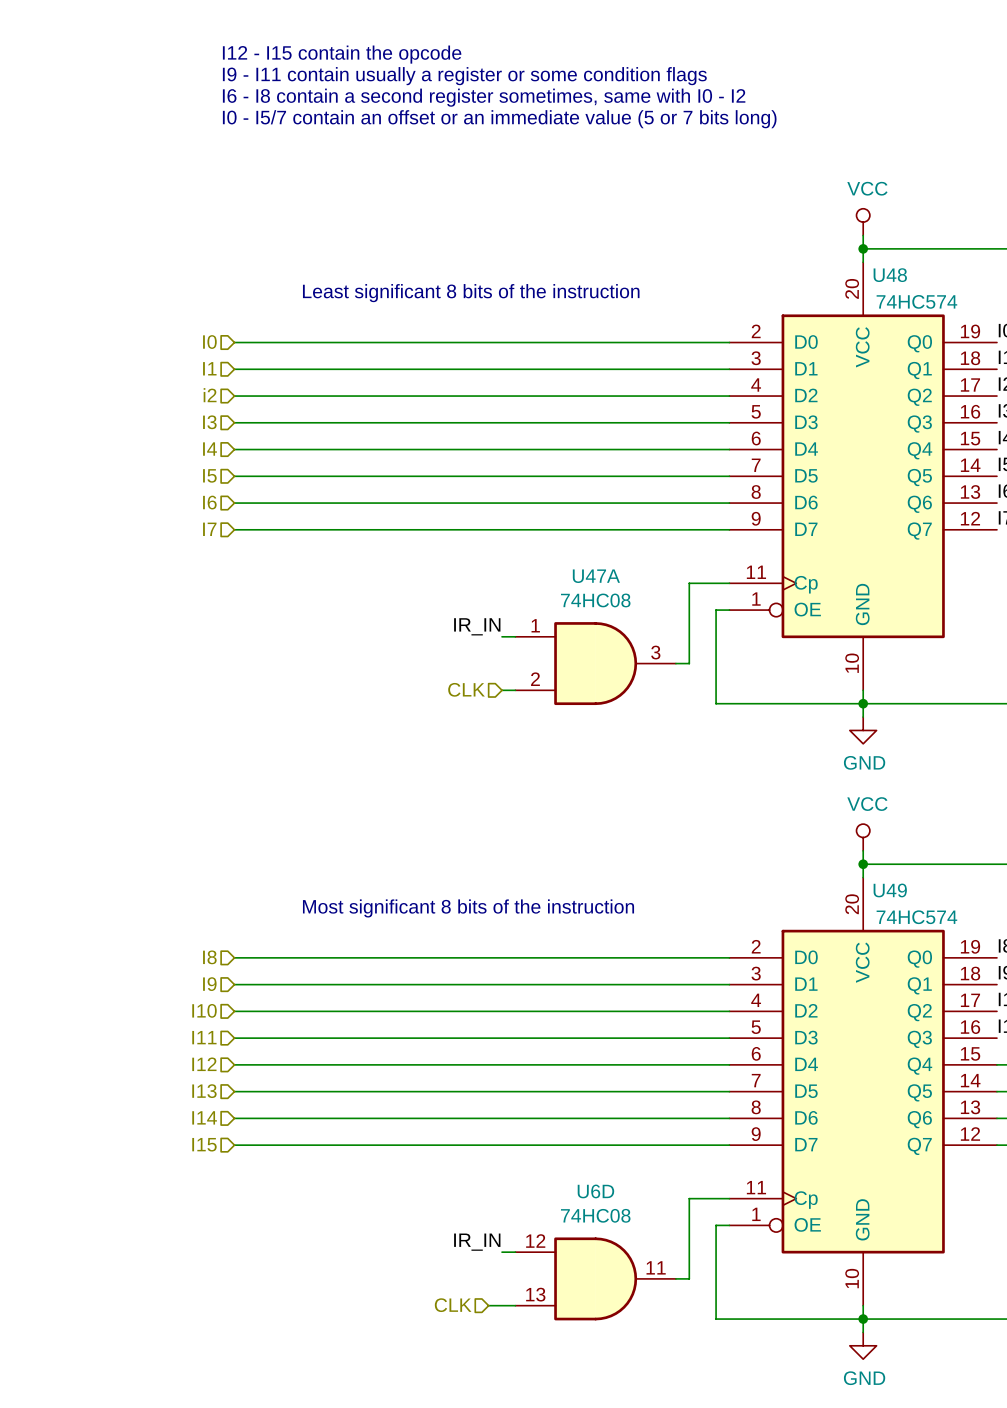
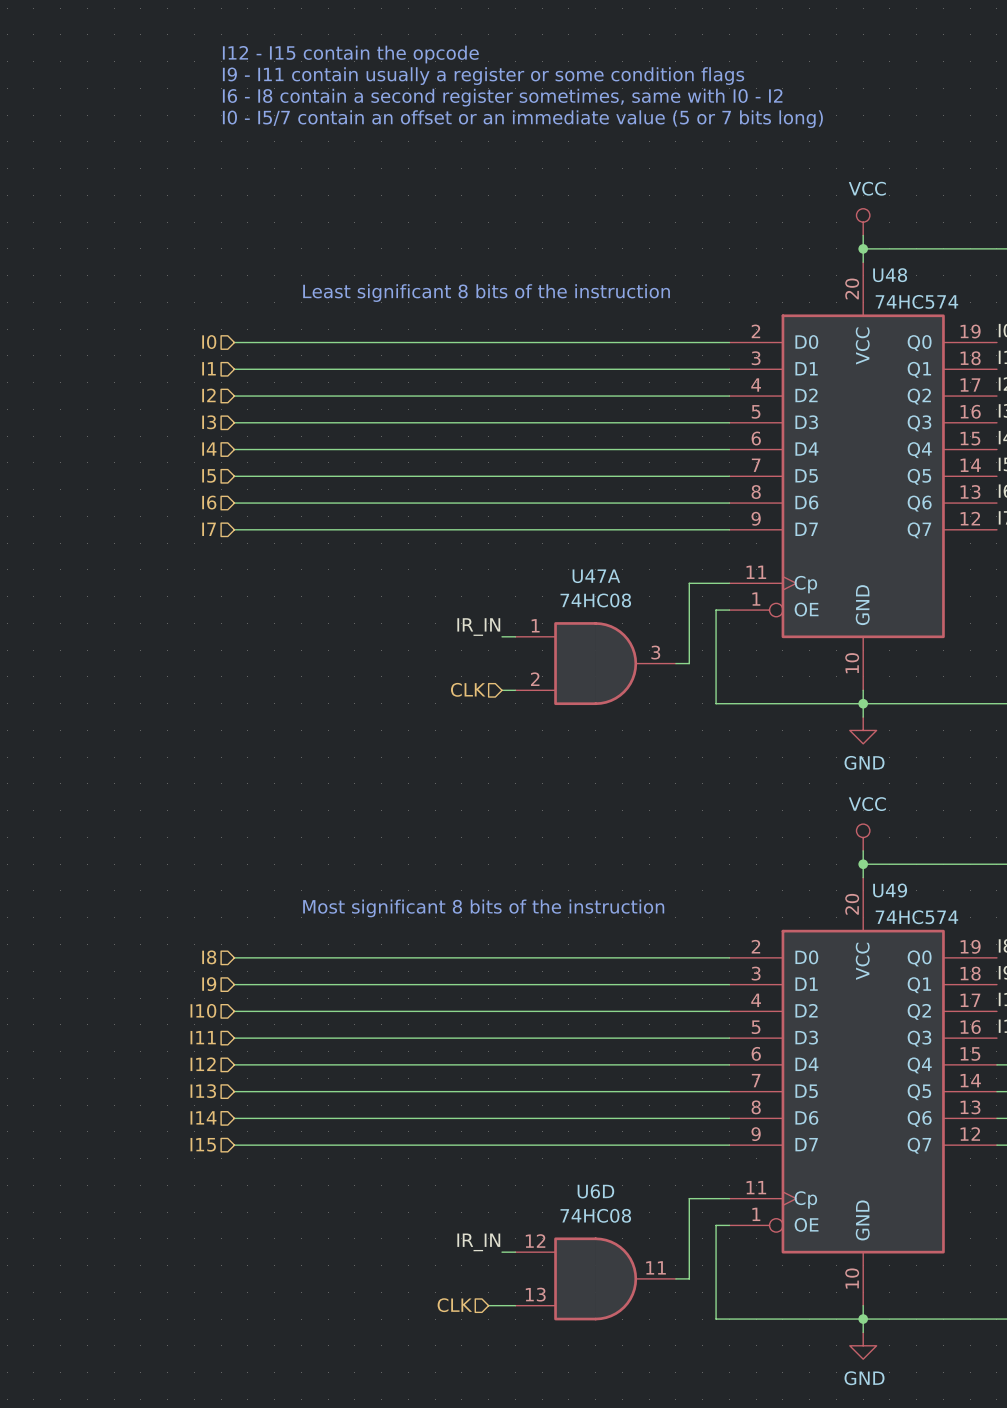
hierarchical label: i2 (210, 395) -> I2 (208, 395)

